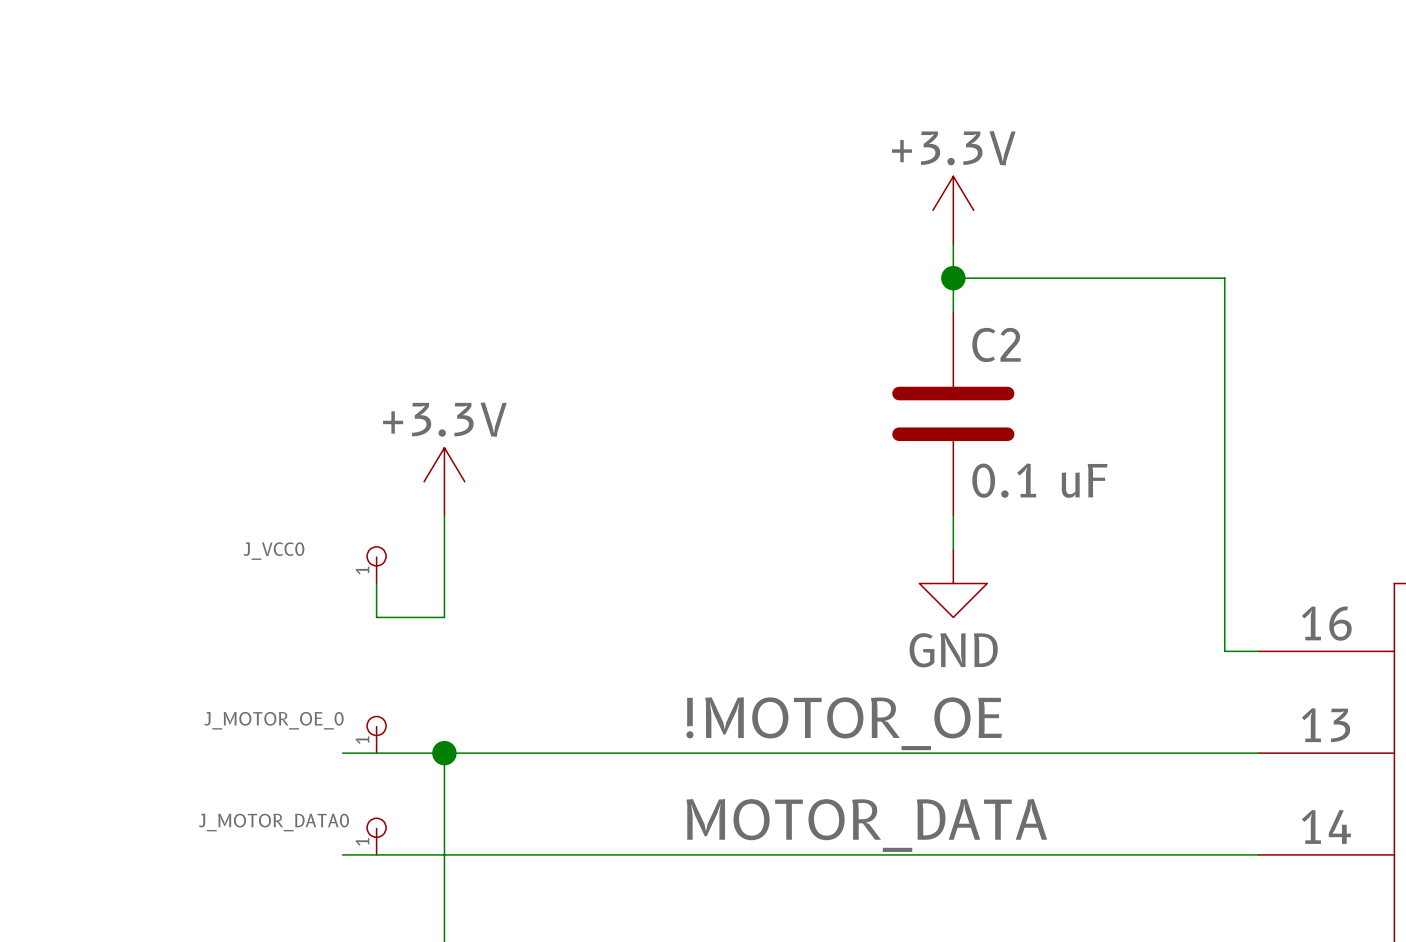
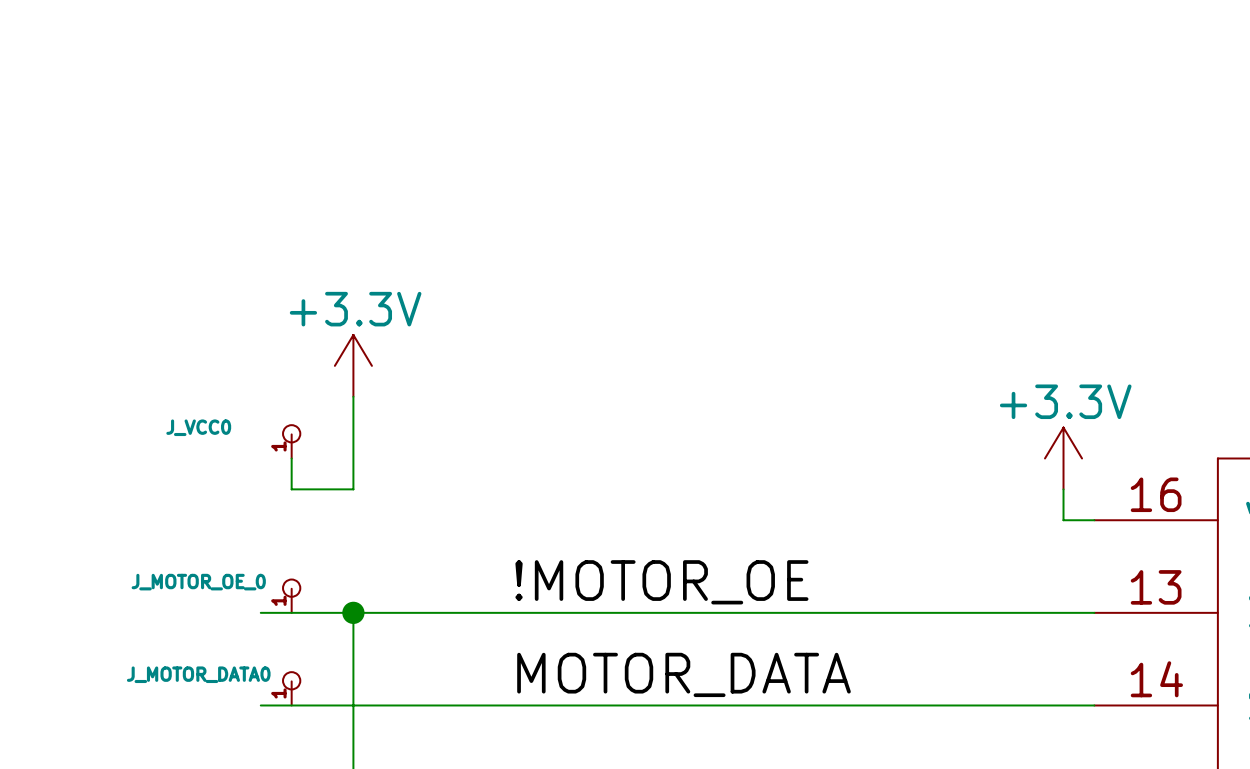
power symbol position: +3.3V (953, 210) -> +3.3V (1063, 458)
wire: (953, 244) (953, 312) -> none
wire: (953, 278) (1224, 278) (1224, 617) -> none
junction: (953, 278) -> none
C2: 0.1 uF (953, 413) -> none
wire: (953, 515) (953, 549) -> none
power symbol: GND (953, 583) -> none
label position: !MOTOR_OE (844, 723) -> !MOTOR_OE (661, 582)
label position: MOTOR_DATA (866, 825) -> MOTOR_DATA (683, 674)

